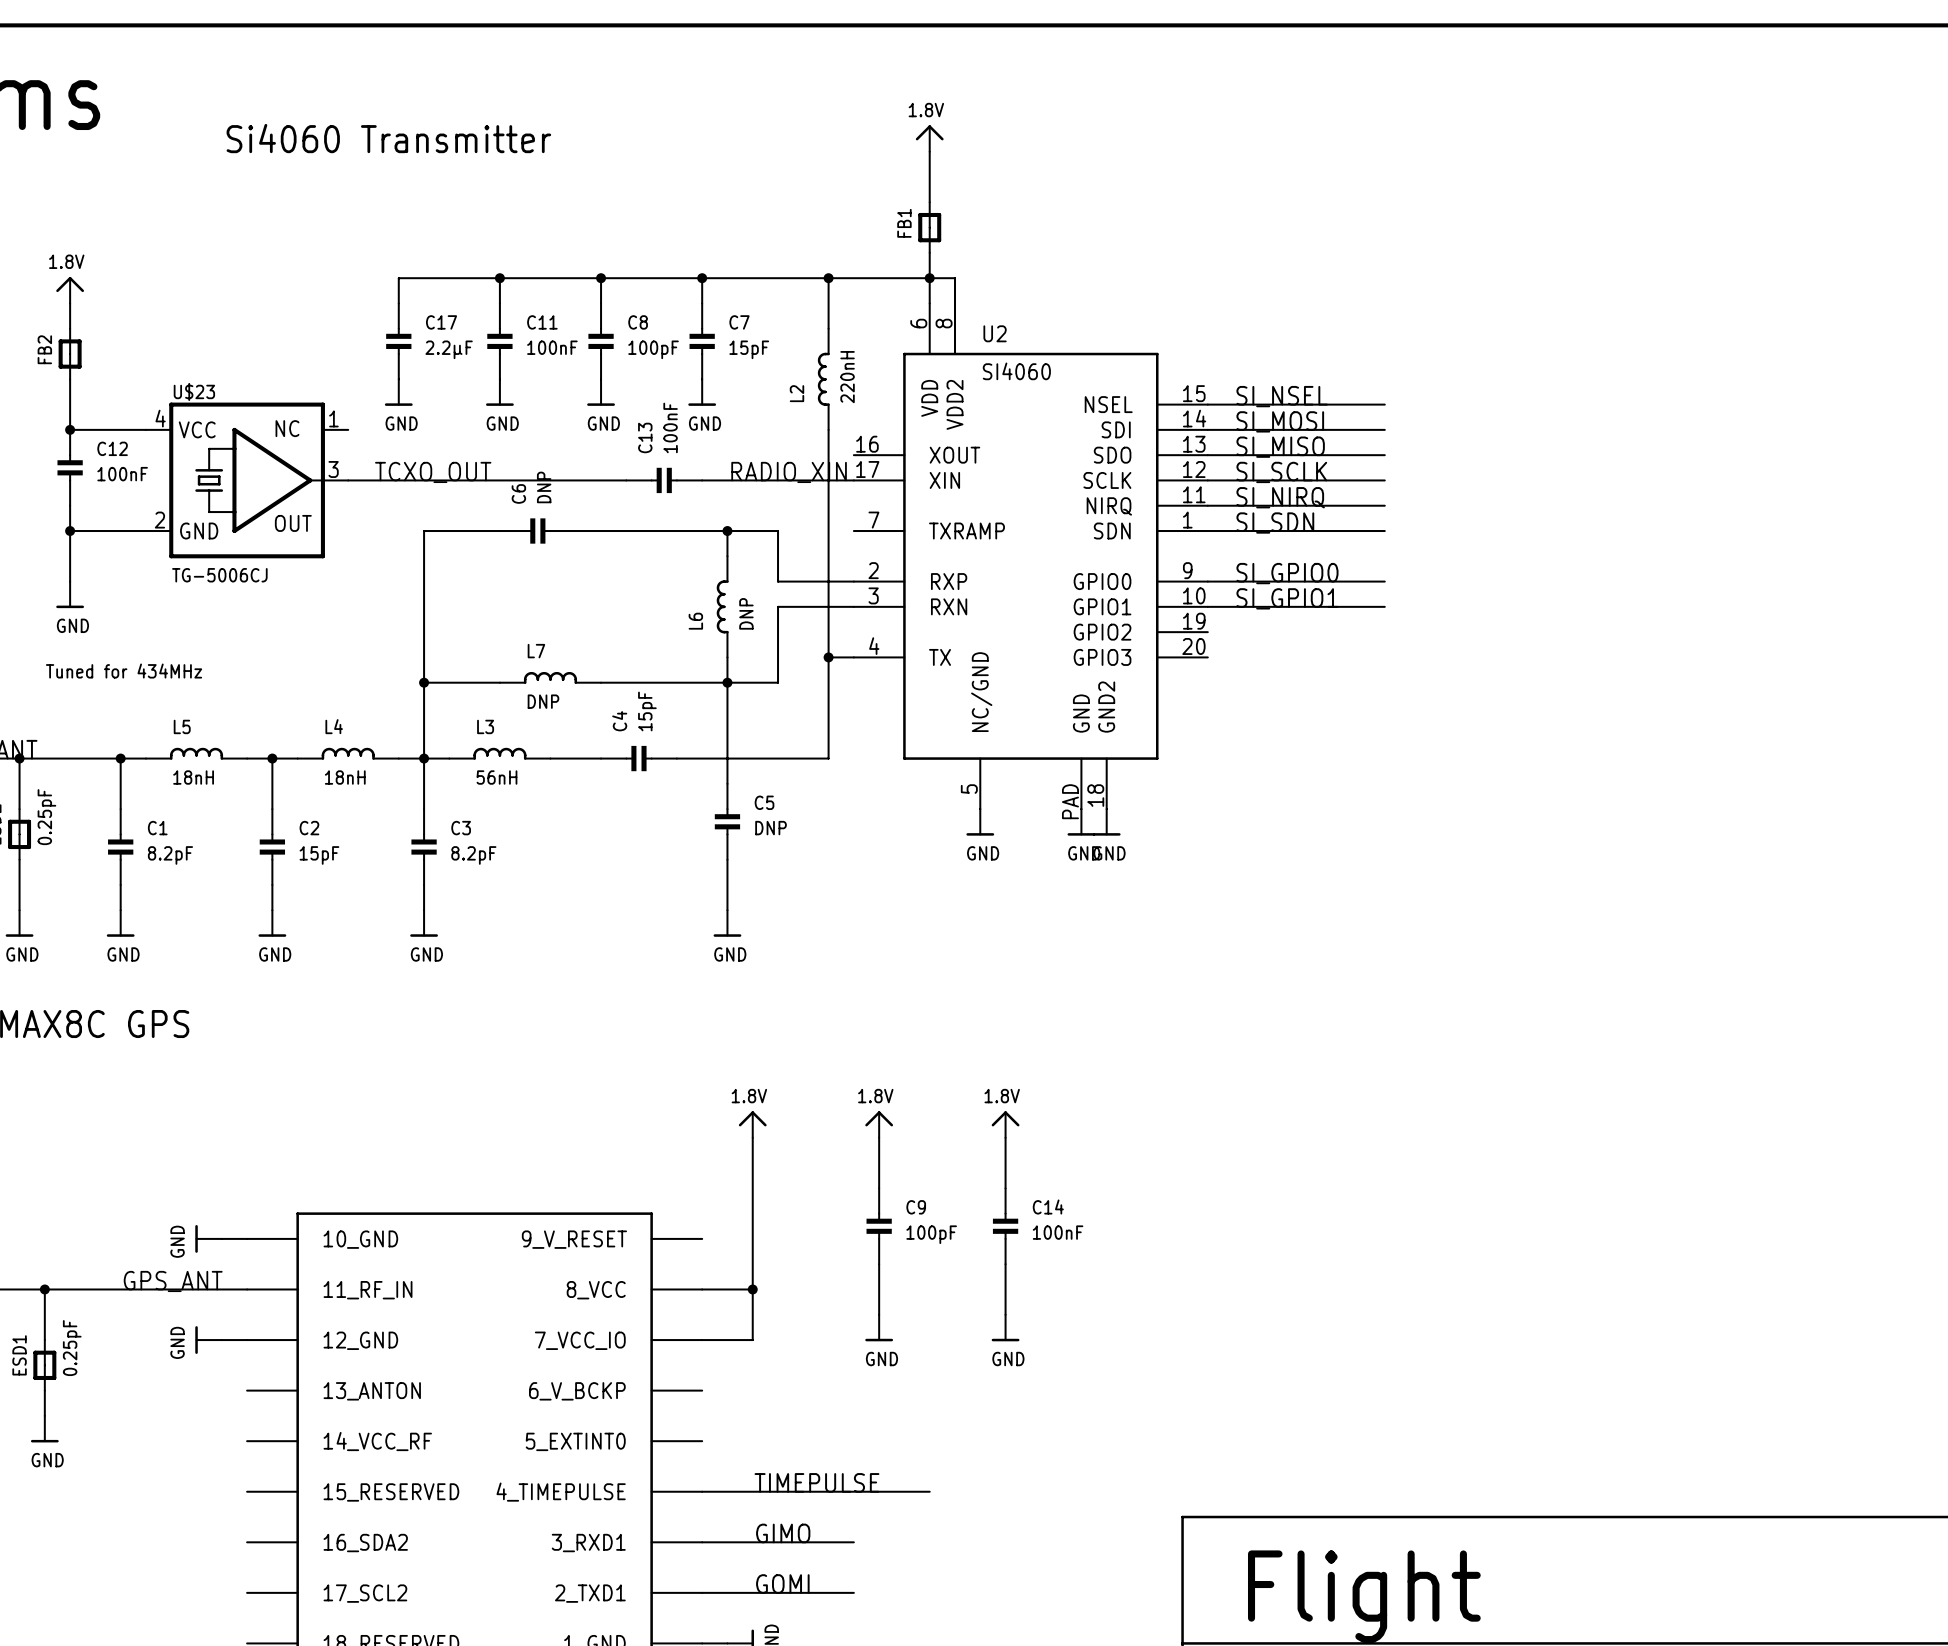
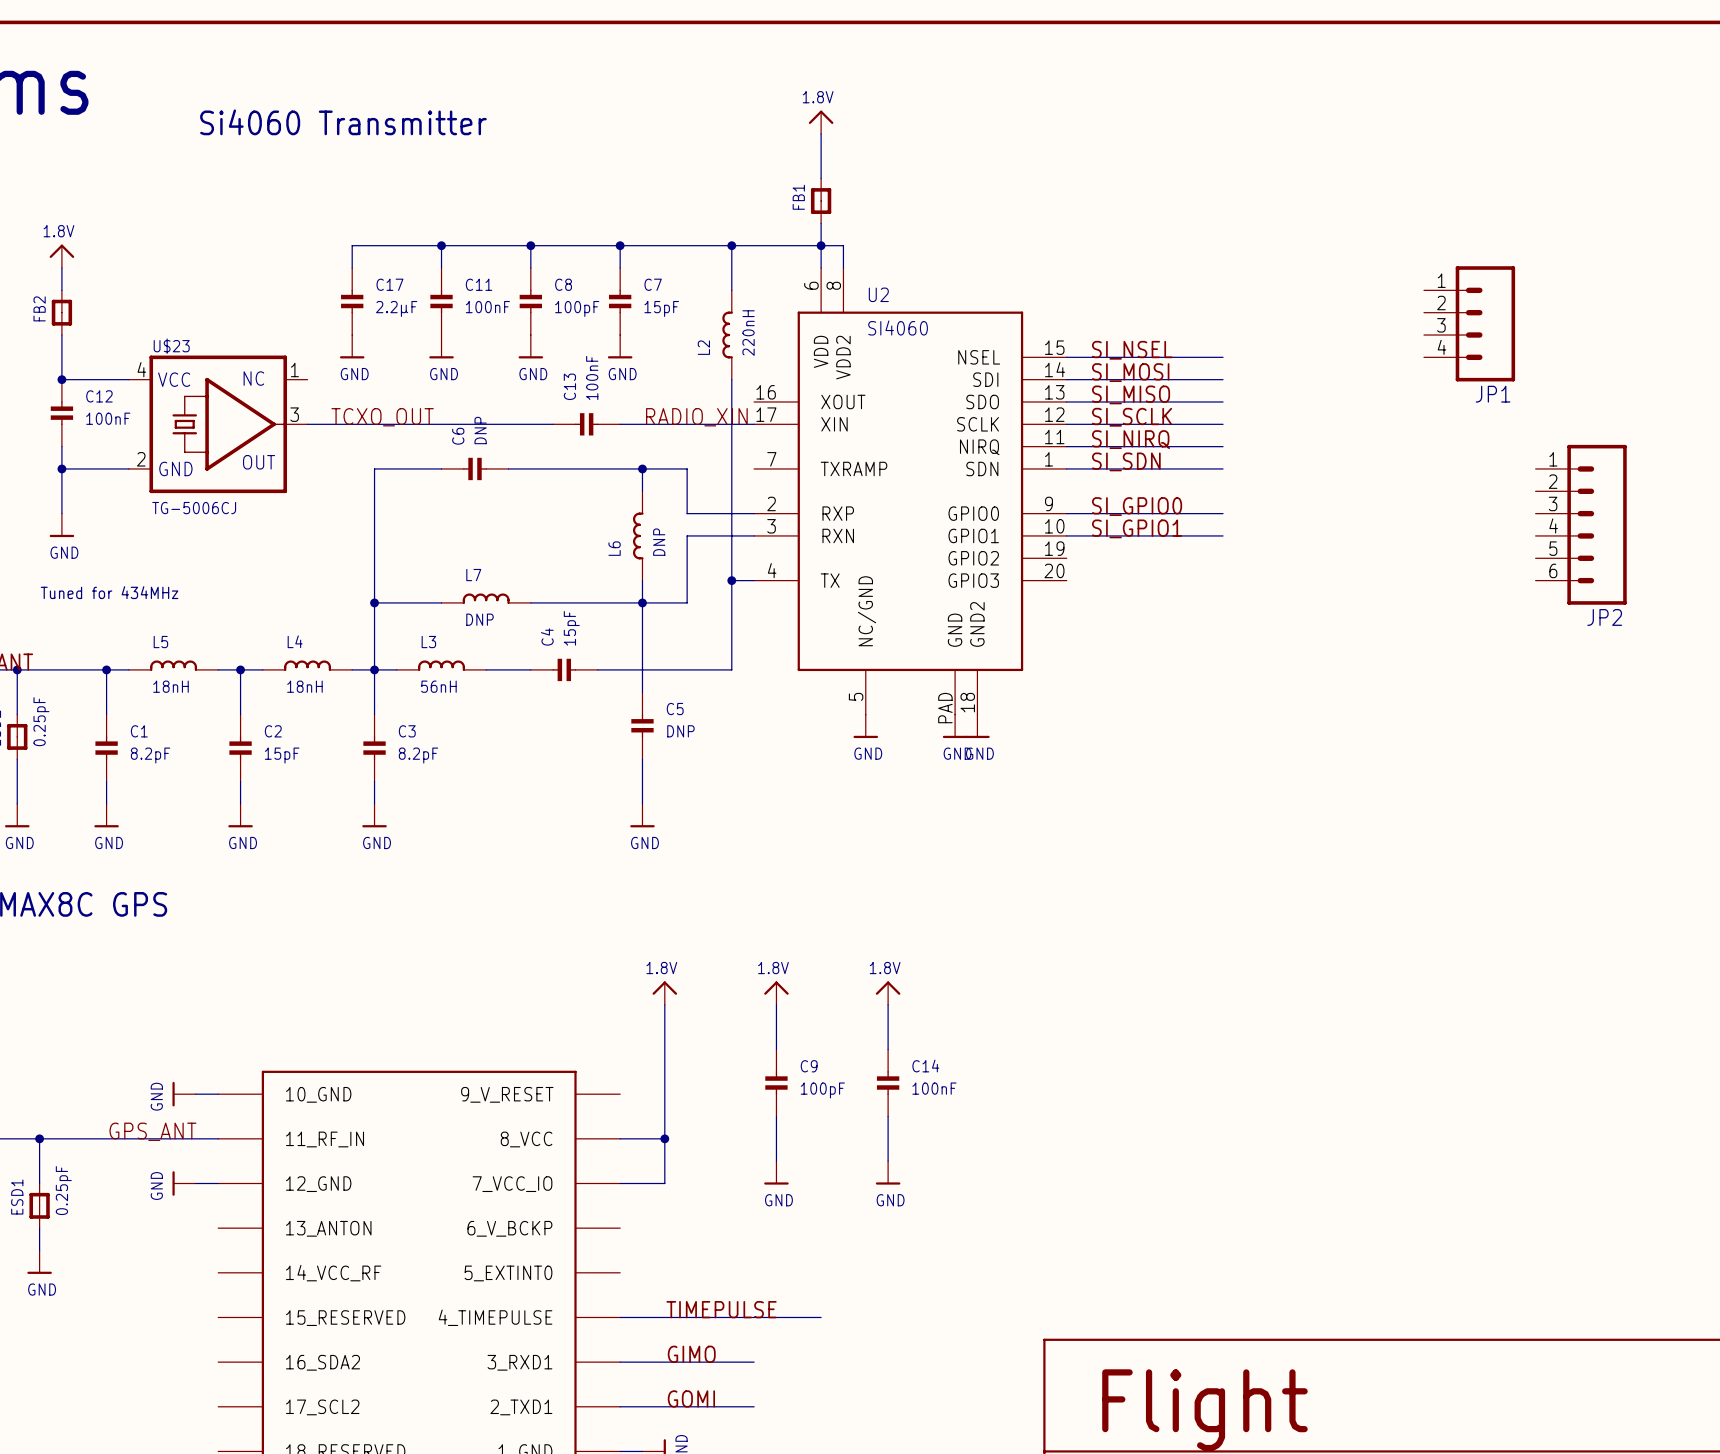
JP1: none -> (1469, 323)
JP2: none -> (1581, 524)

